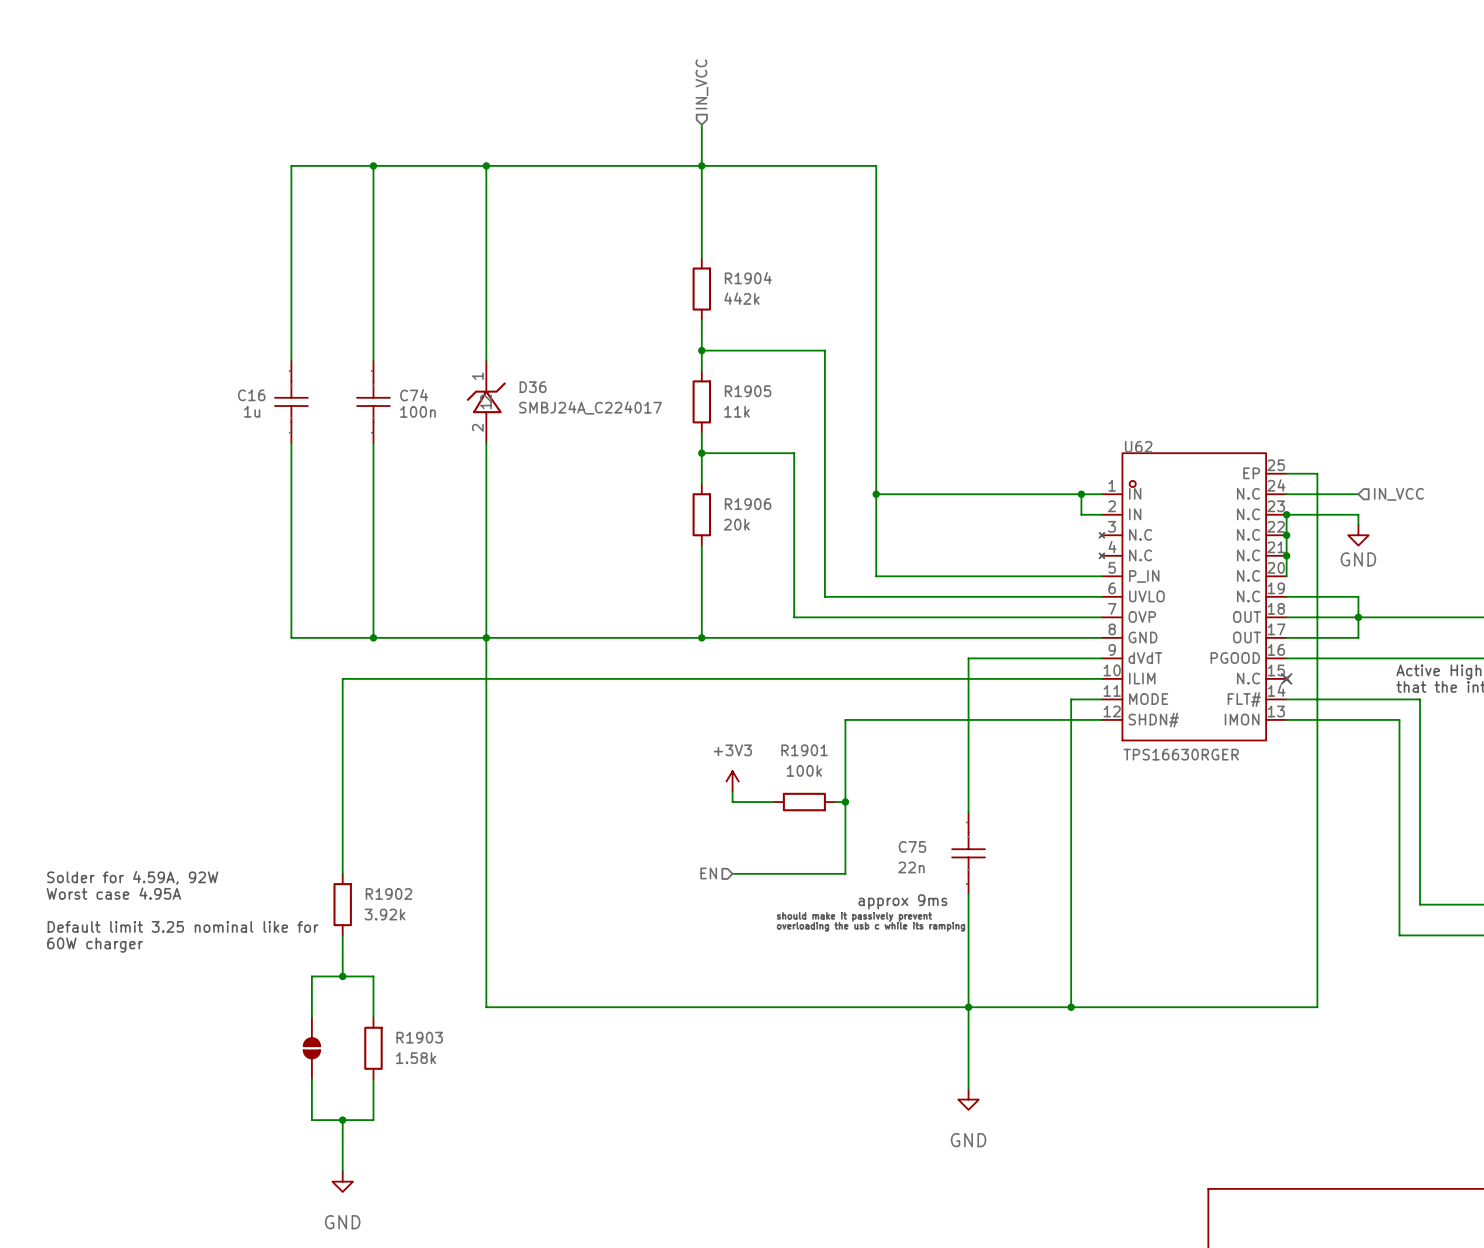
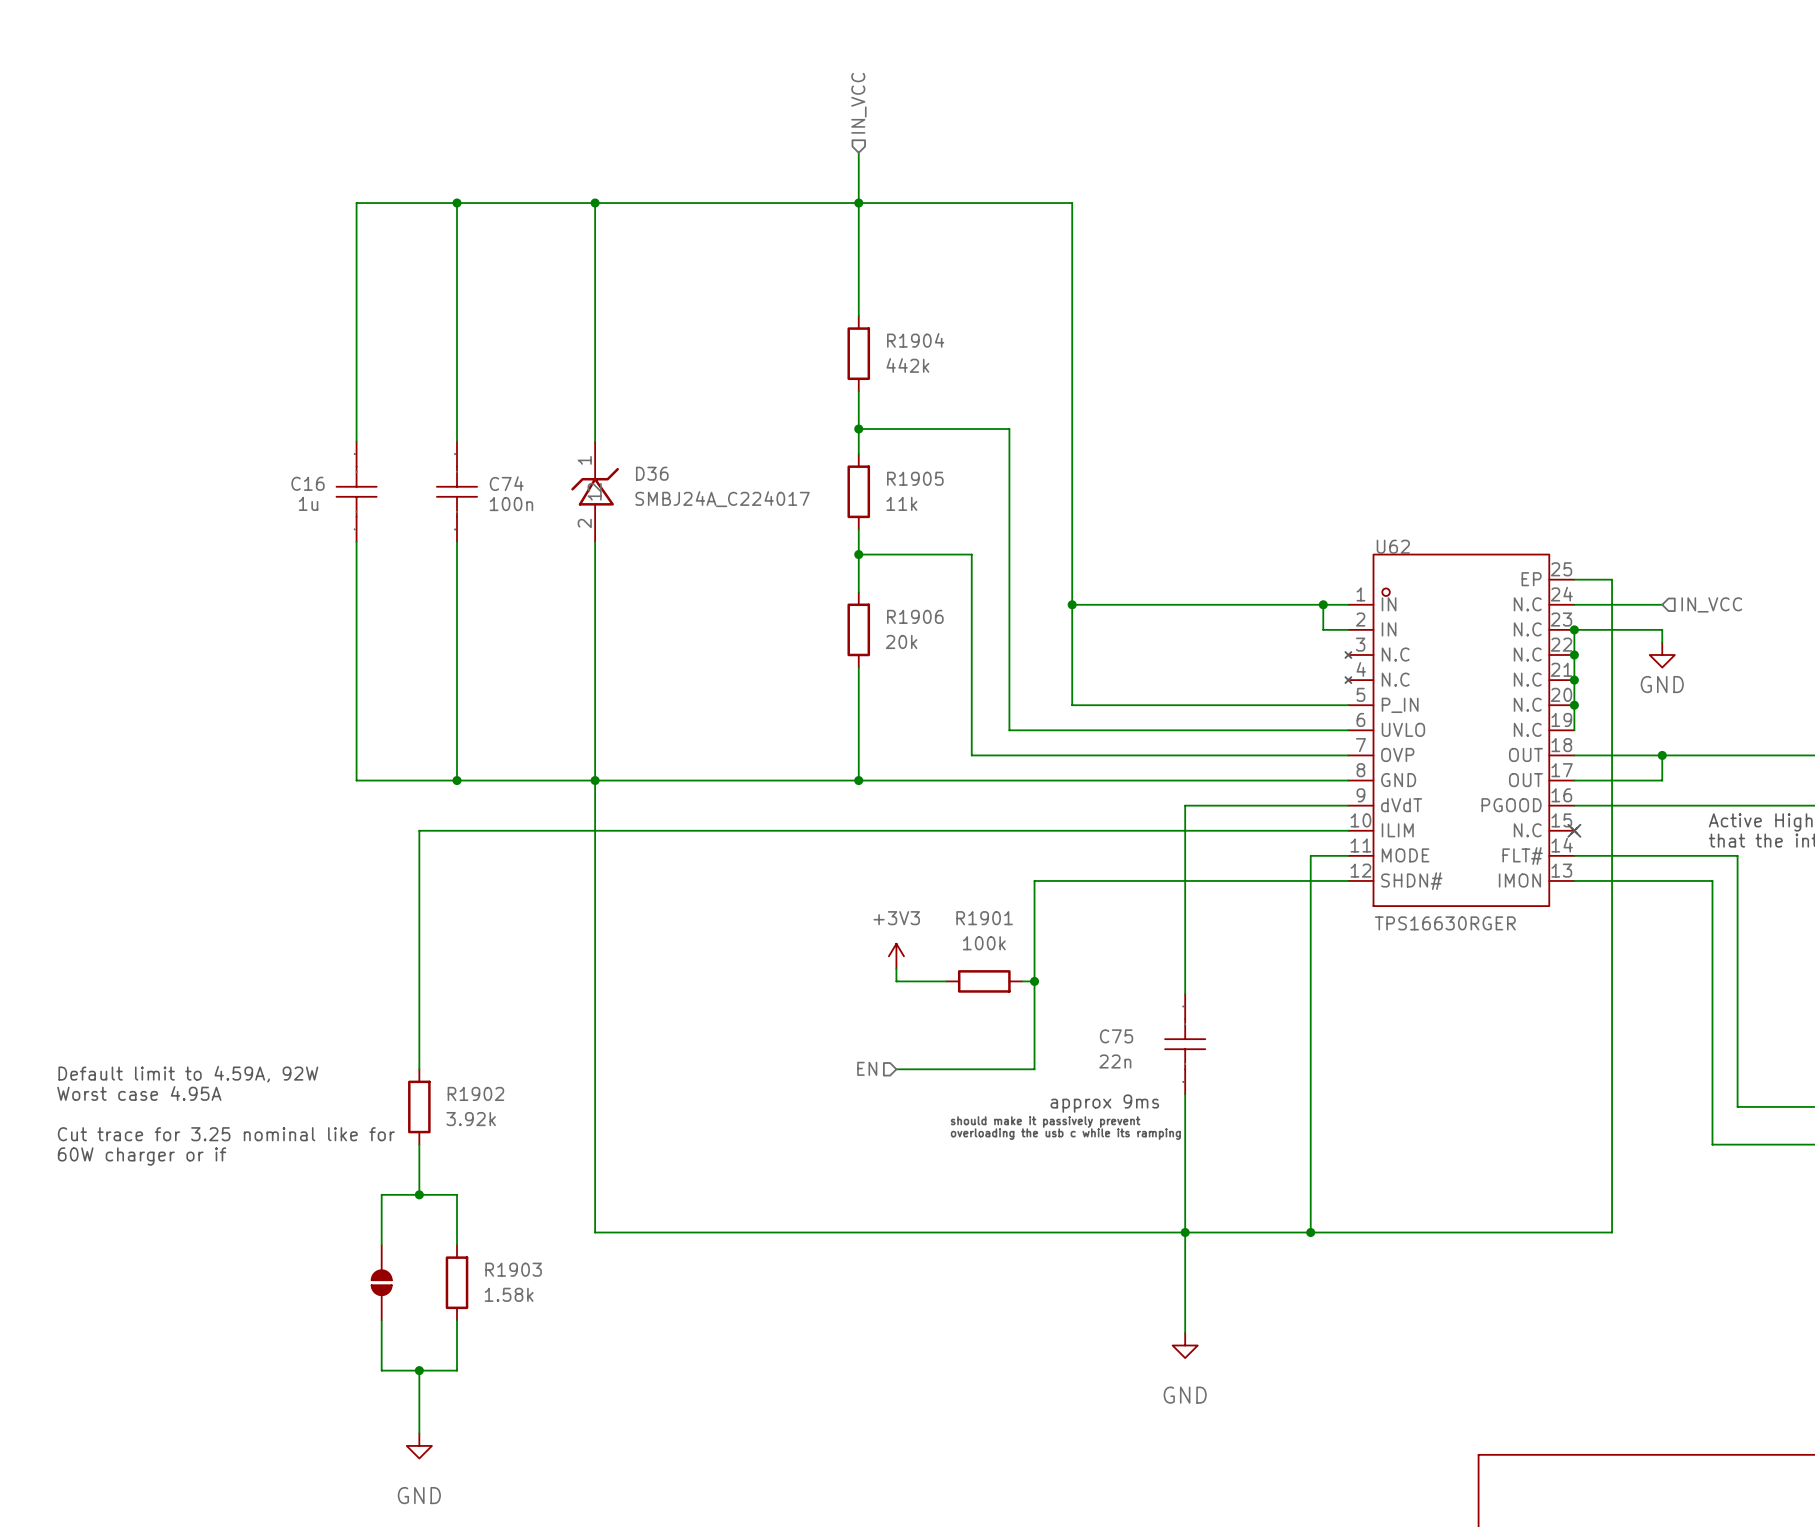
junction: none -> (1574, 705)
wire: (1286, 596) (1358, 596) (1358, 617) -> (1574, 730) (1574, 705)
text: Solder for 4.59A, 92W (132, 877) -> Default limit to 4.59A, 92W (188, 1074)
text: Default limit 3.25 nominal like for (183, 926) -> Cut trace for 3.25 nominal like for (226, 1134)
text: 60W charger (95, 945) -> 60W charger or if (142, 1156)

